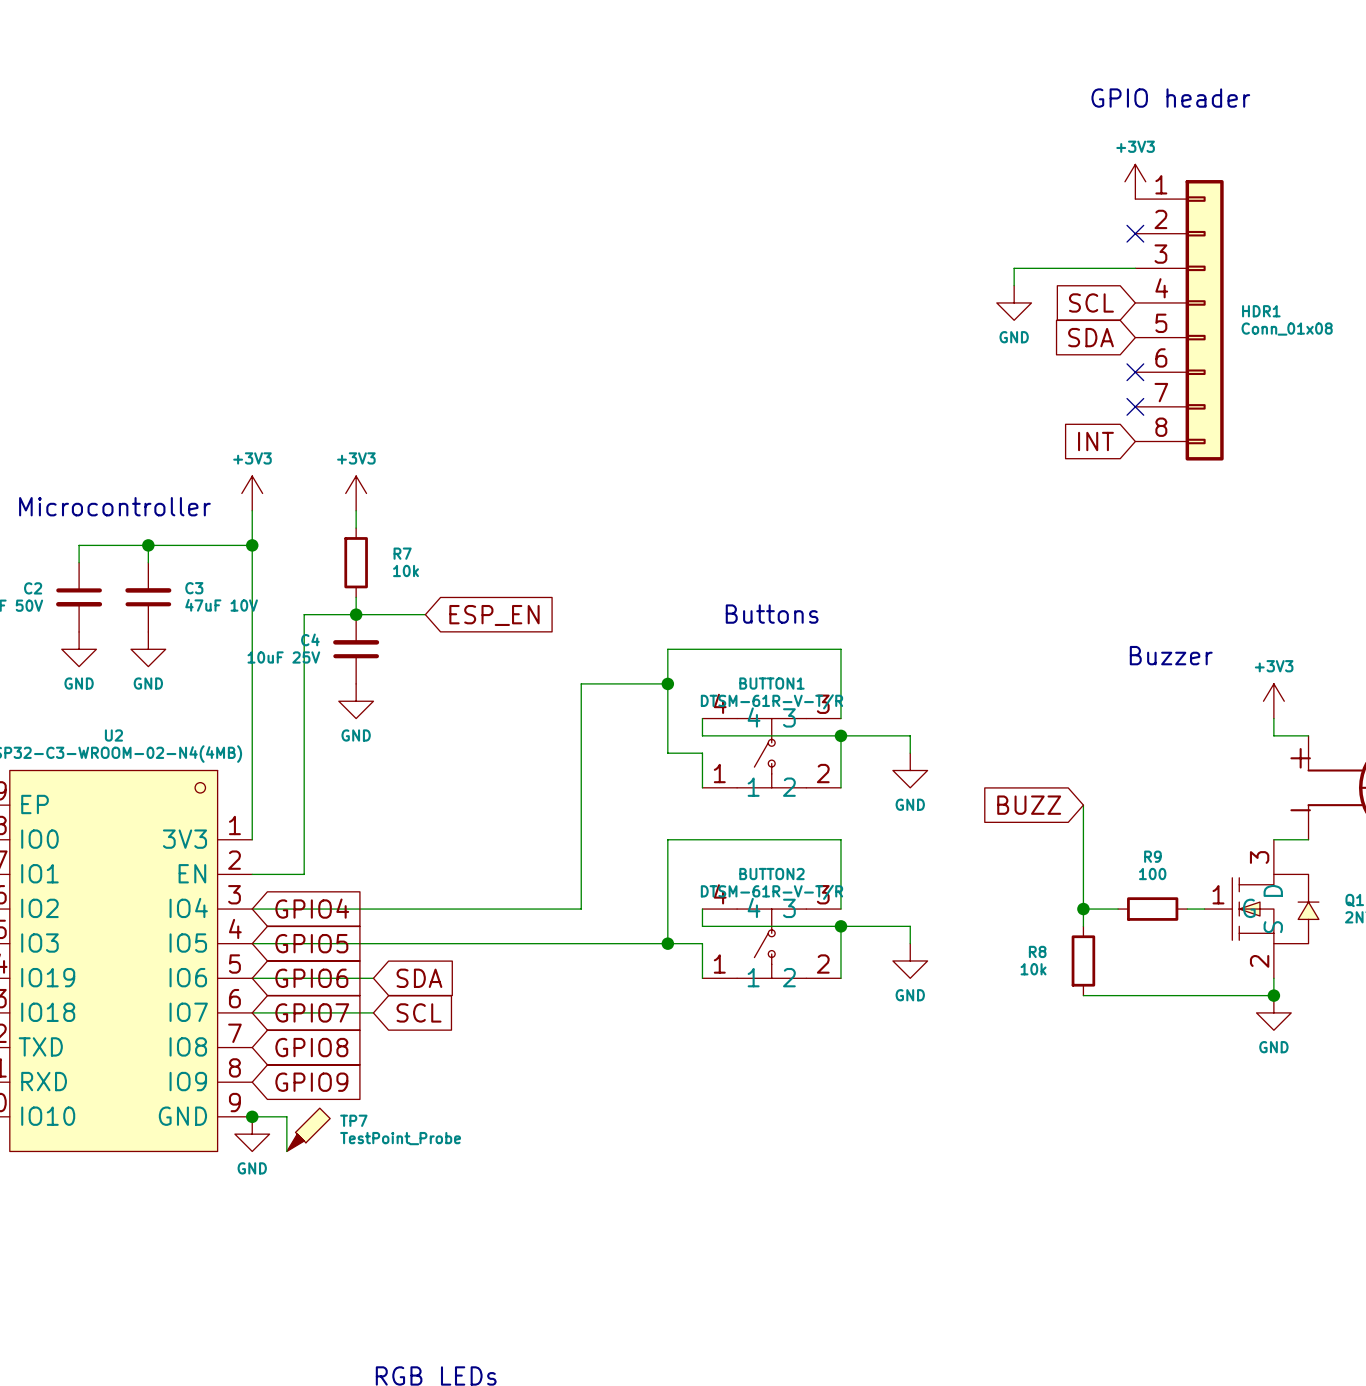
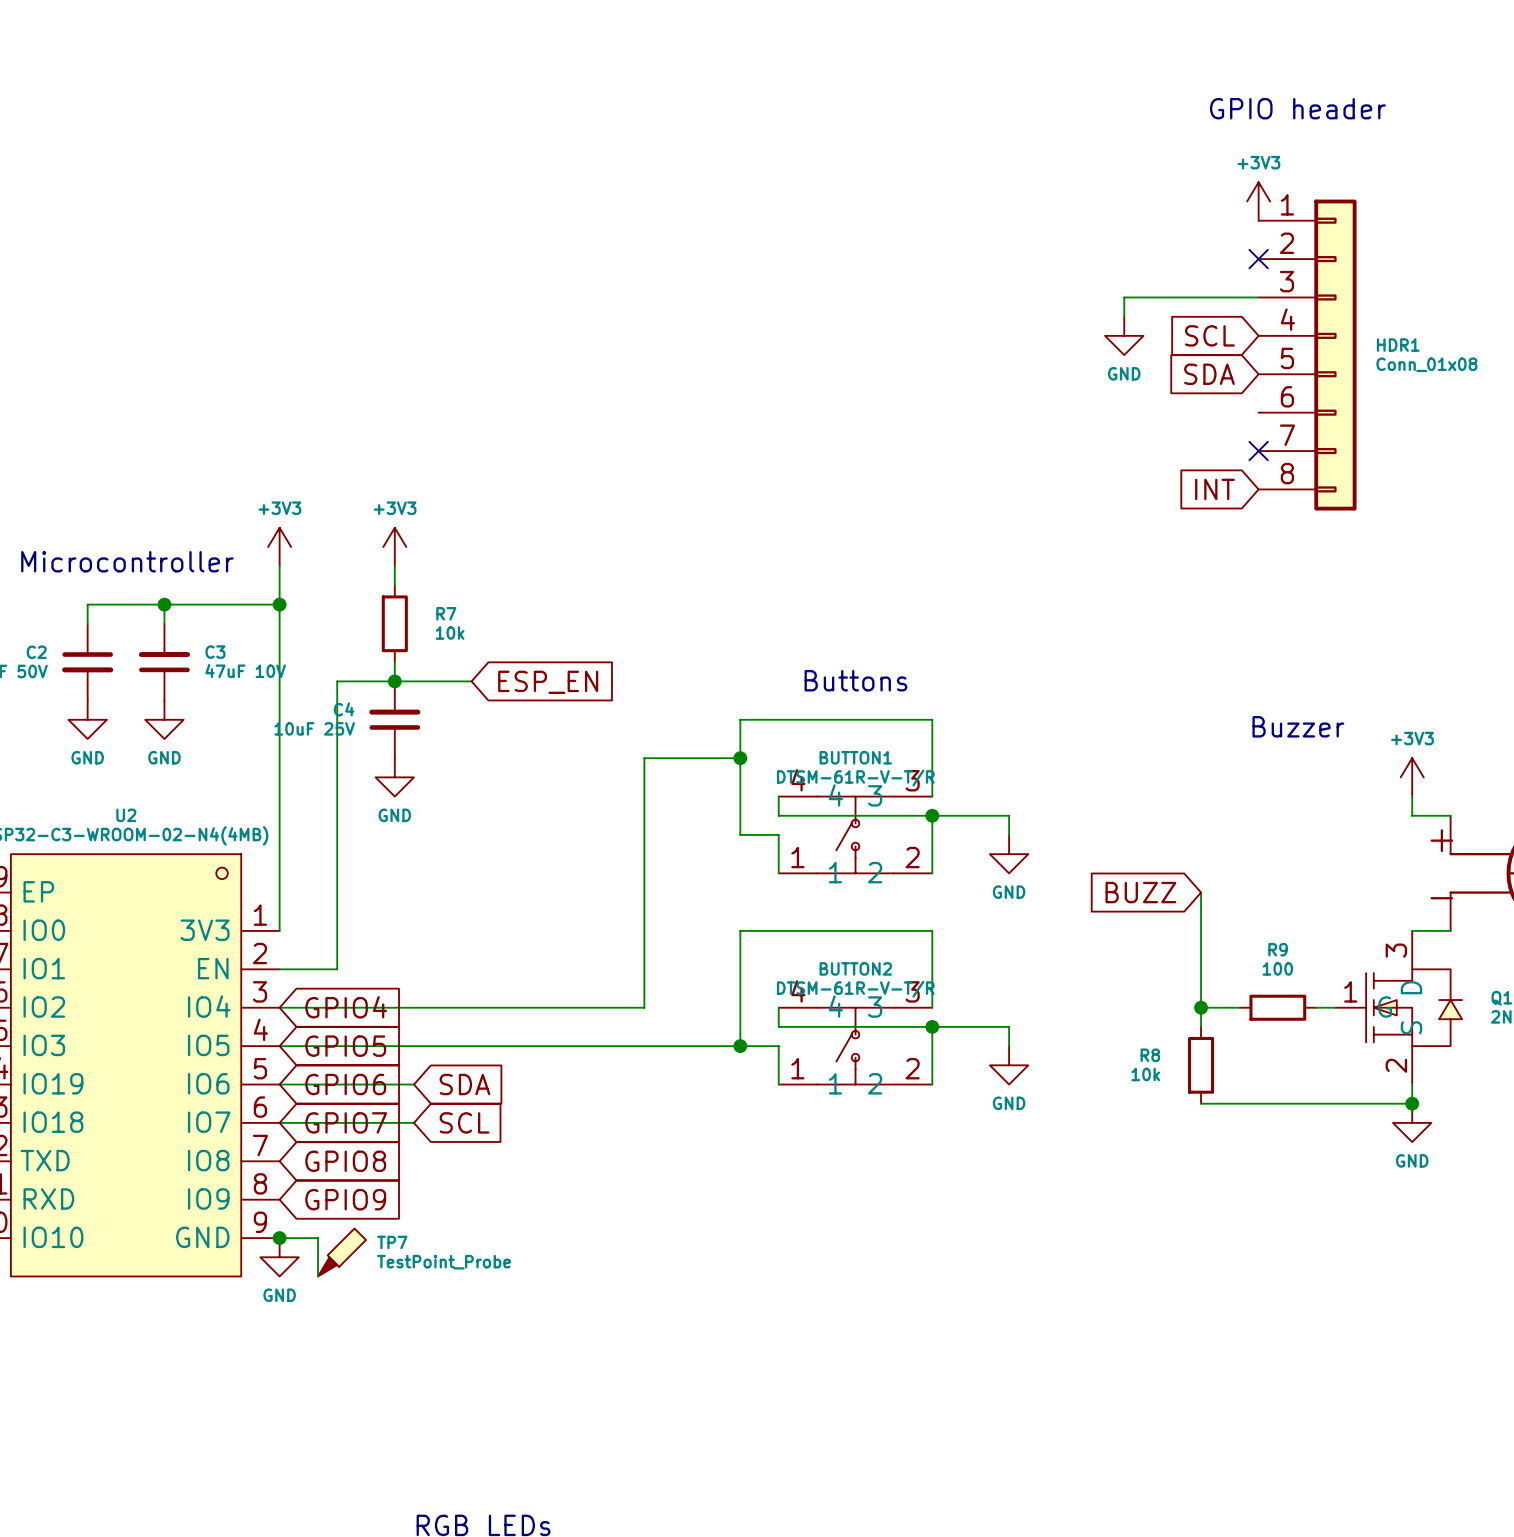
no-connect mark: (1135, 372) -> none

